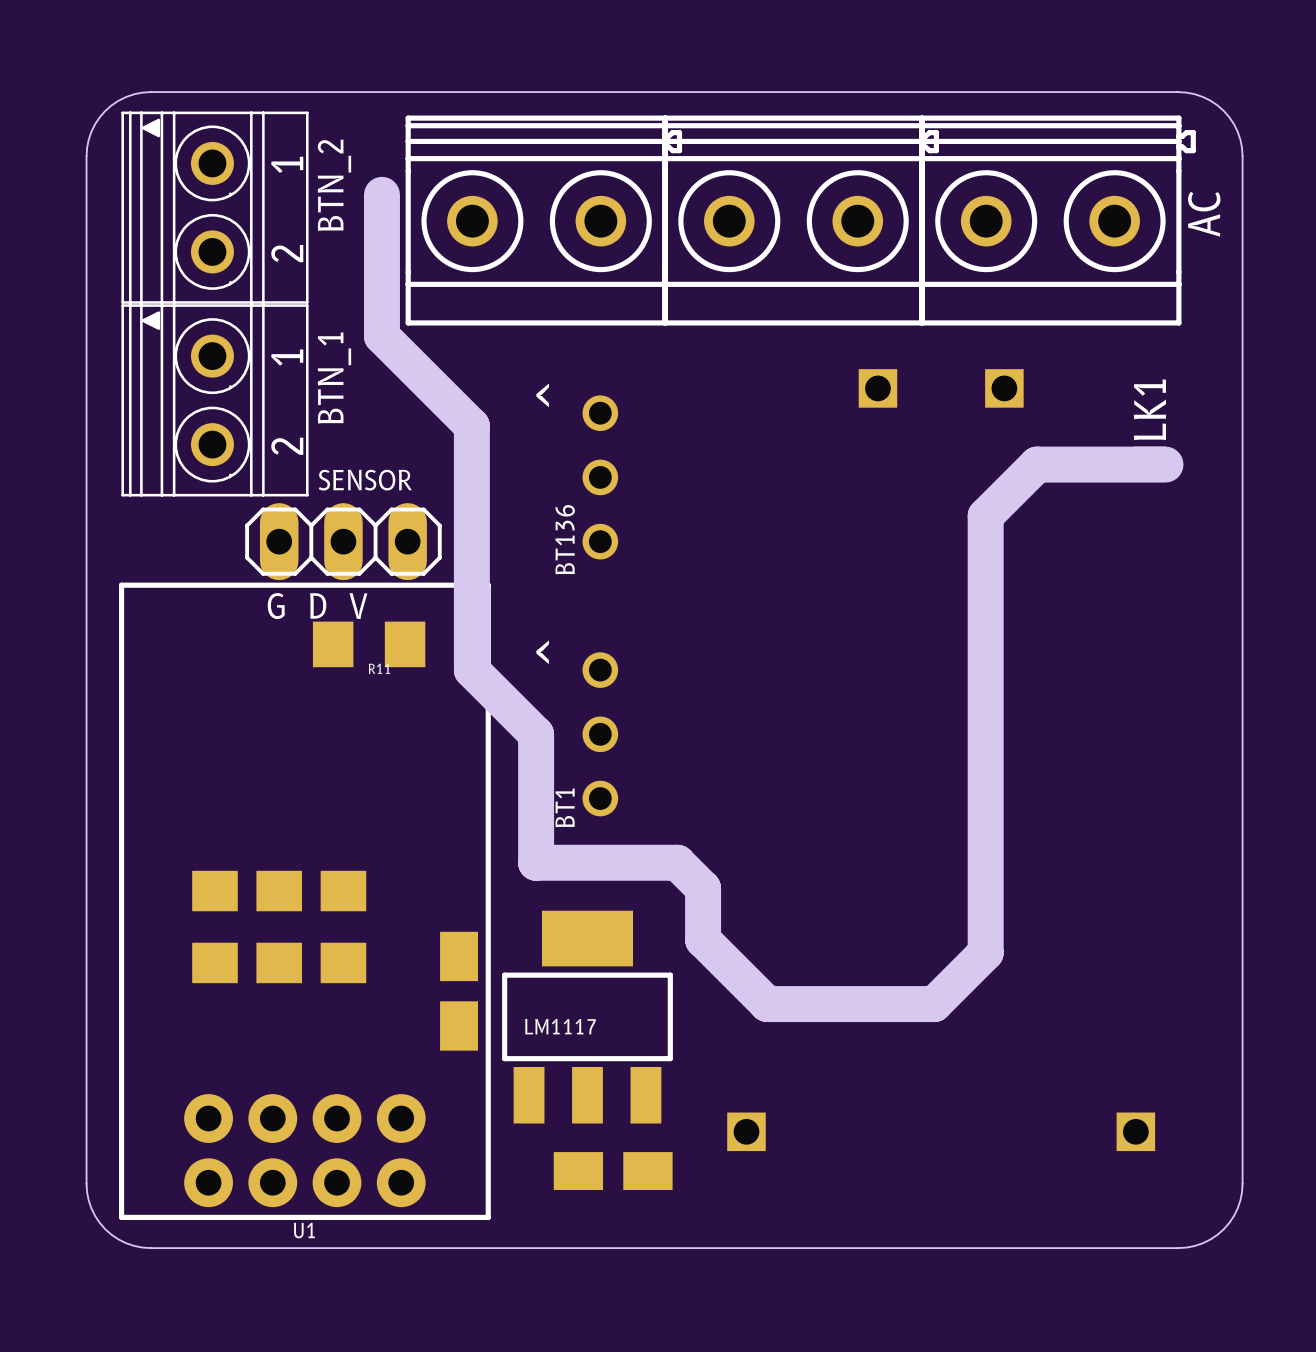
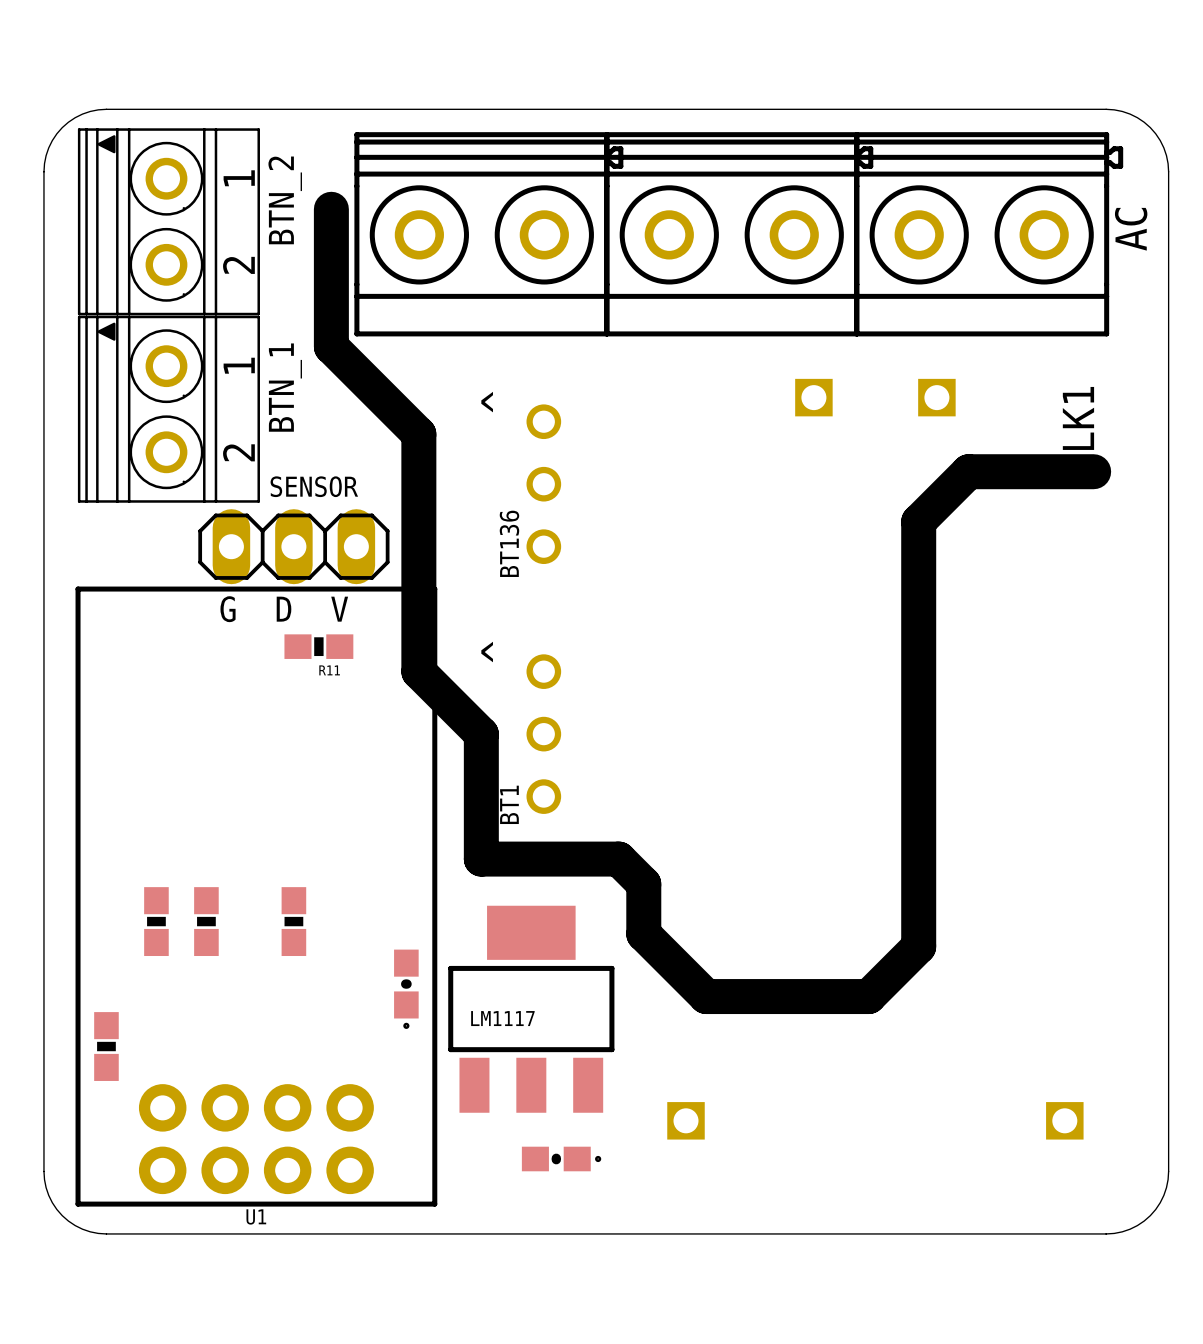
R11 footprint: [312, 621, 426, 668] -> [284, 634, 354, 659]
part footprint: [192, 870, 238, 984] -> [144, 887, 169, 957]
part footprint: [320, 870, 367, 984] -> [281, 887, 307, 957]
part: none -> (206, 921)
part: (279, 926) -> none
part footprint: [440, 931, 479, 1051] -> [394, 949, 419, 1029]
part: none -> (106, 1046)
part footprint: [553, 1152, 673, 1191] -> [521, 1146, 602, 1172]

